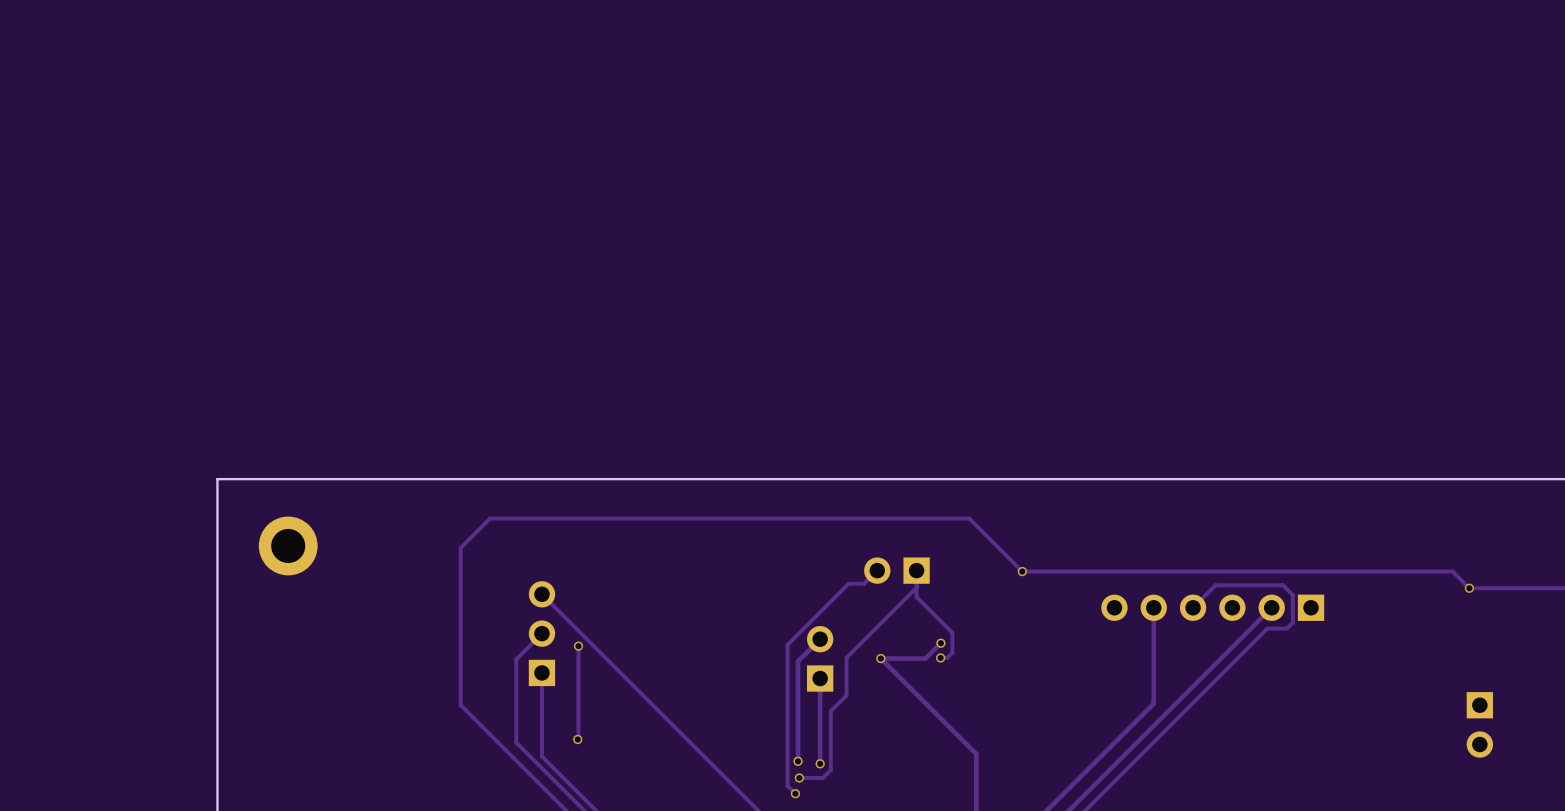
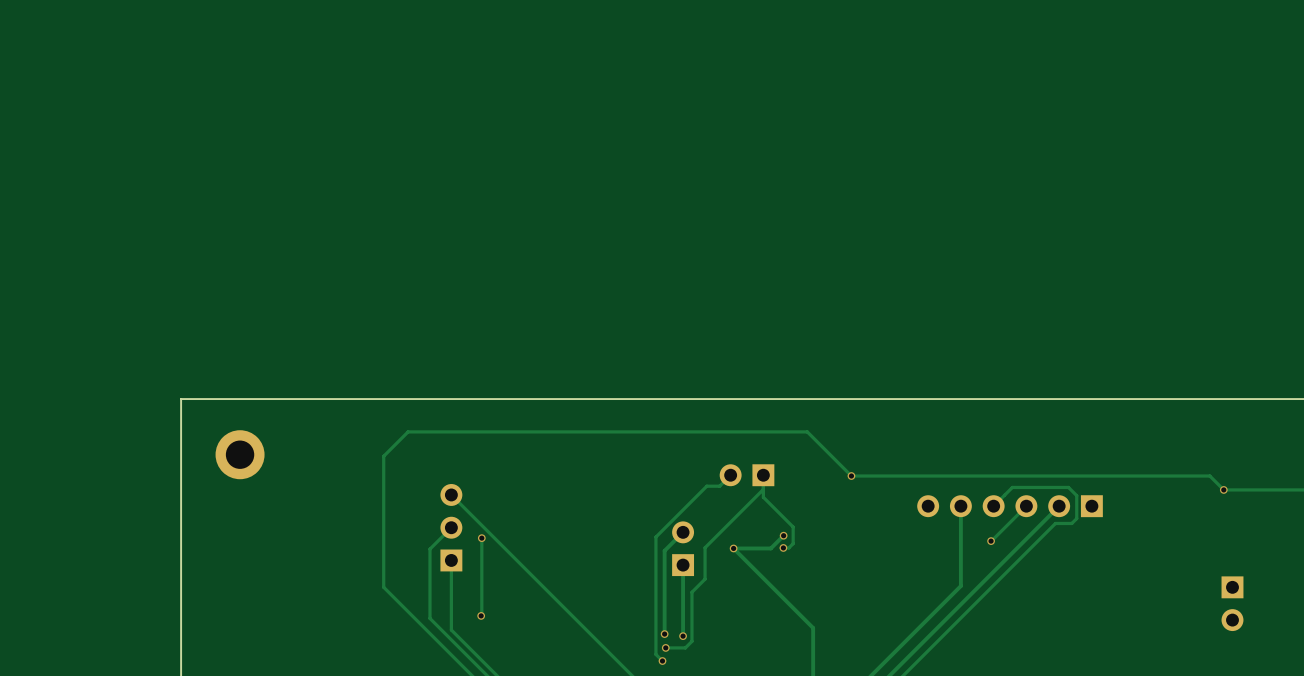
track: none -> (1026, 506) (991, 541)
via: none -> (991, 541)

